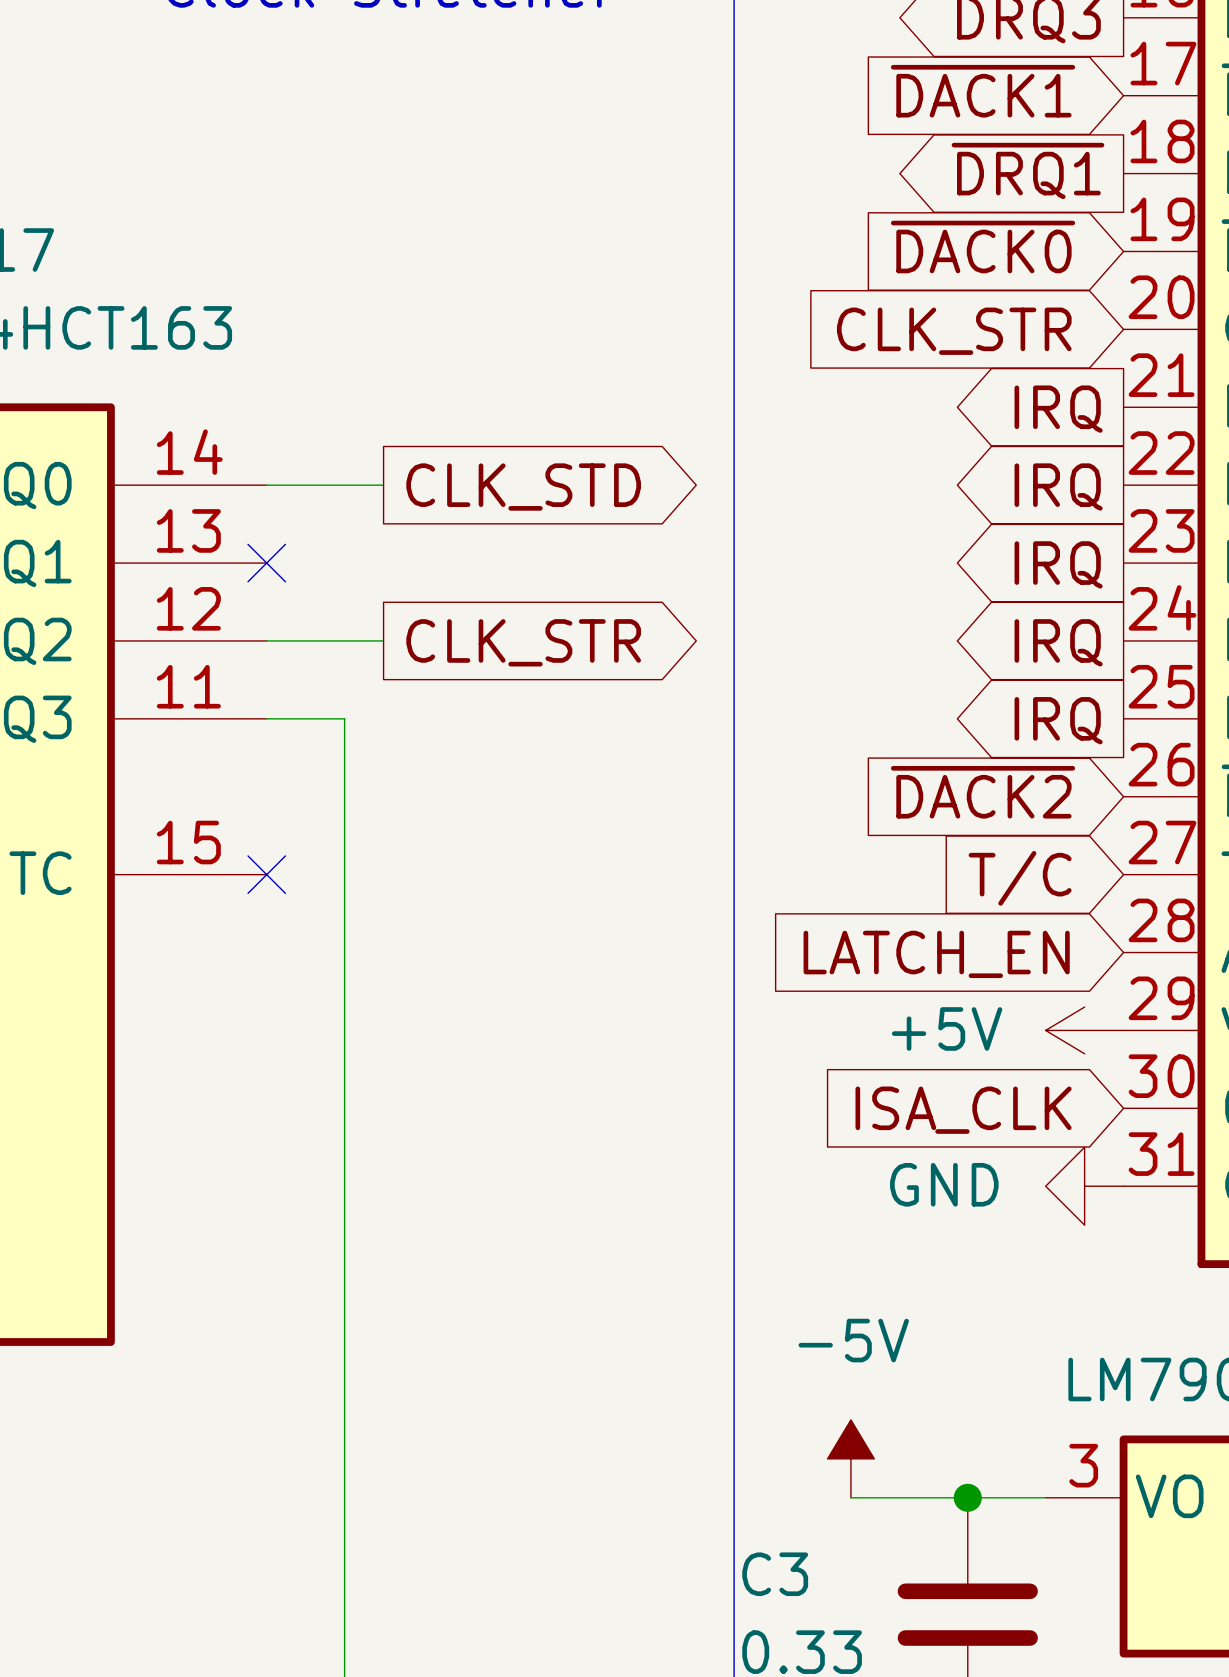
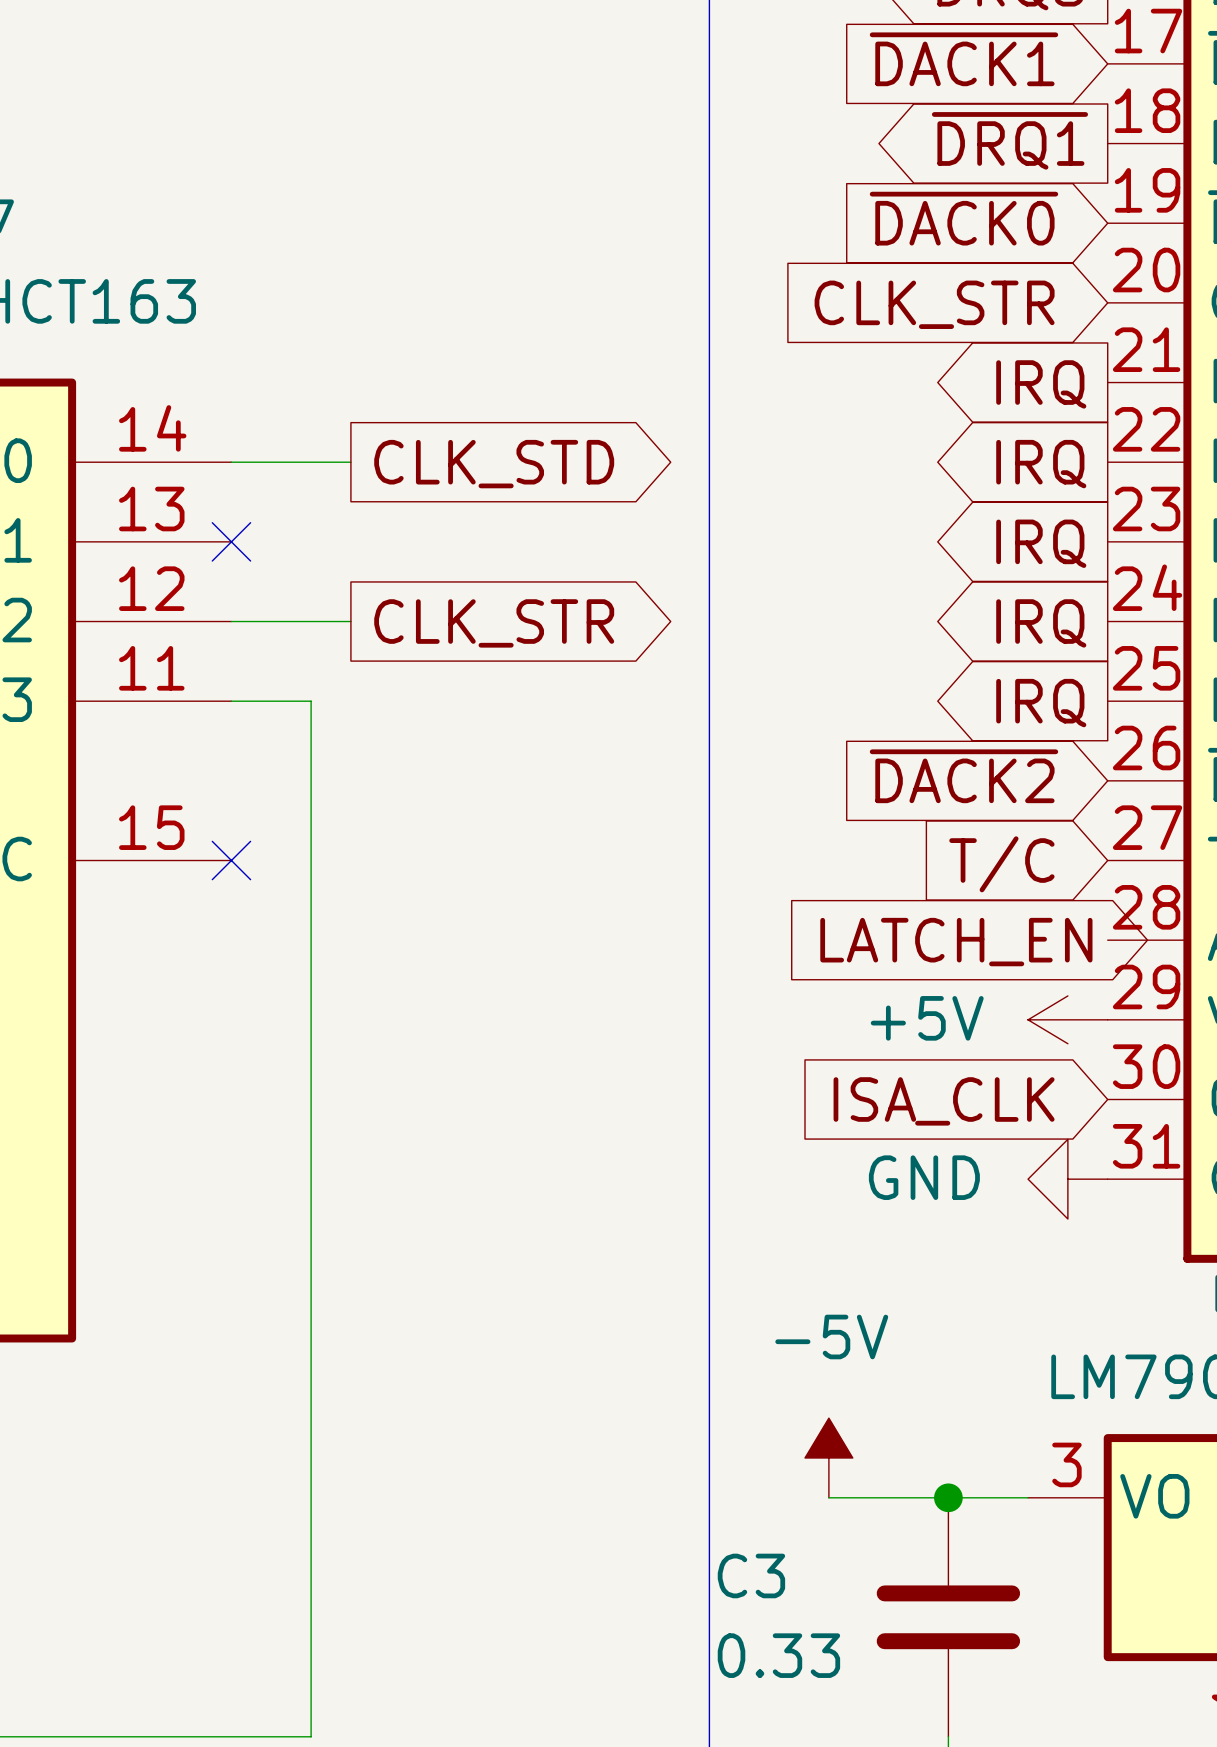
global label position: LATCH_EN (936, 954) -> LATCH_EN (956, 942)

